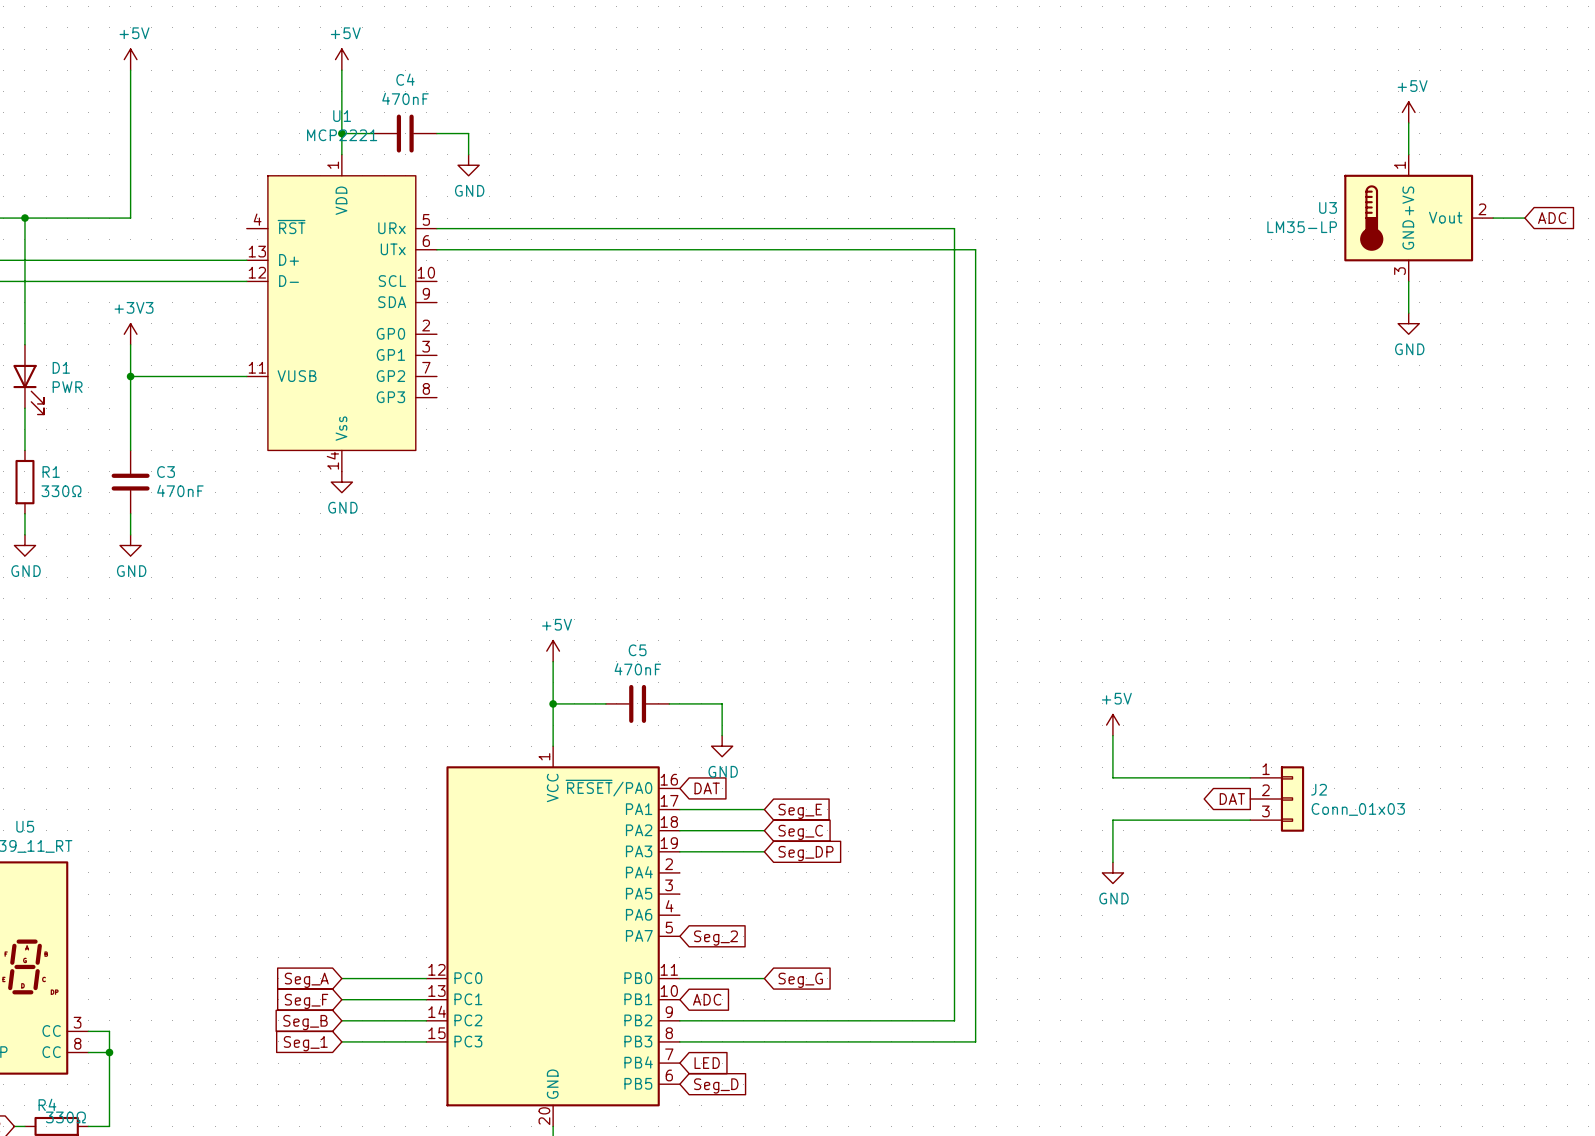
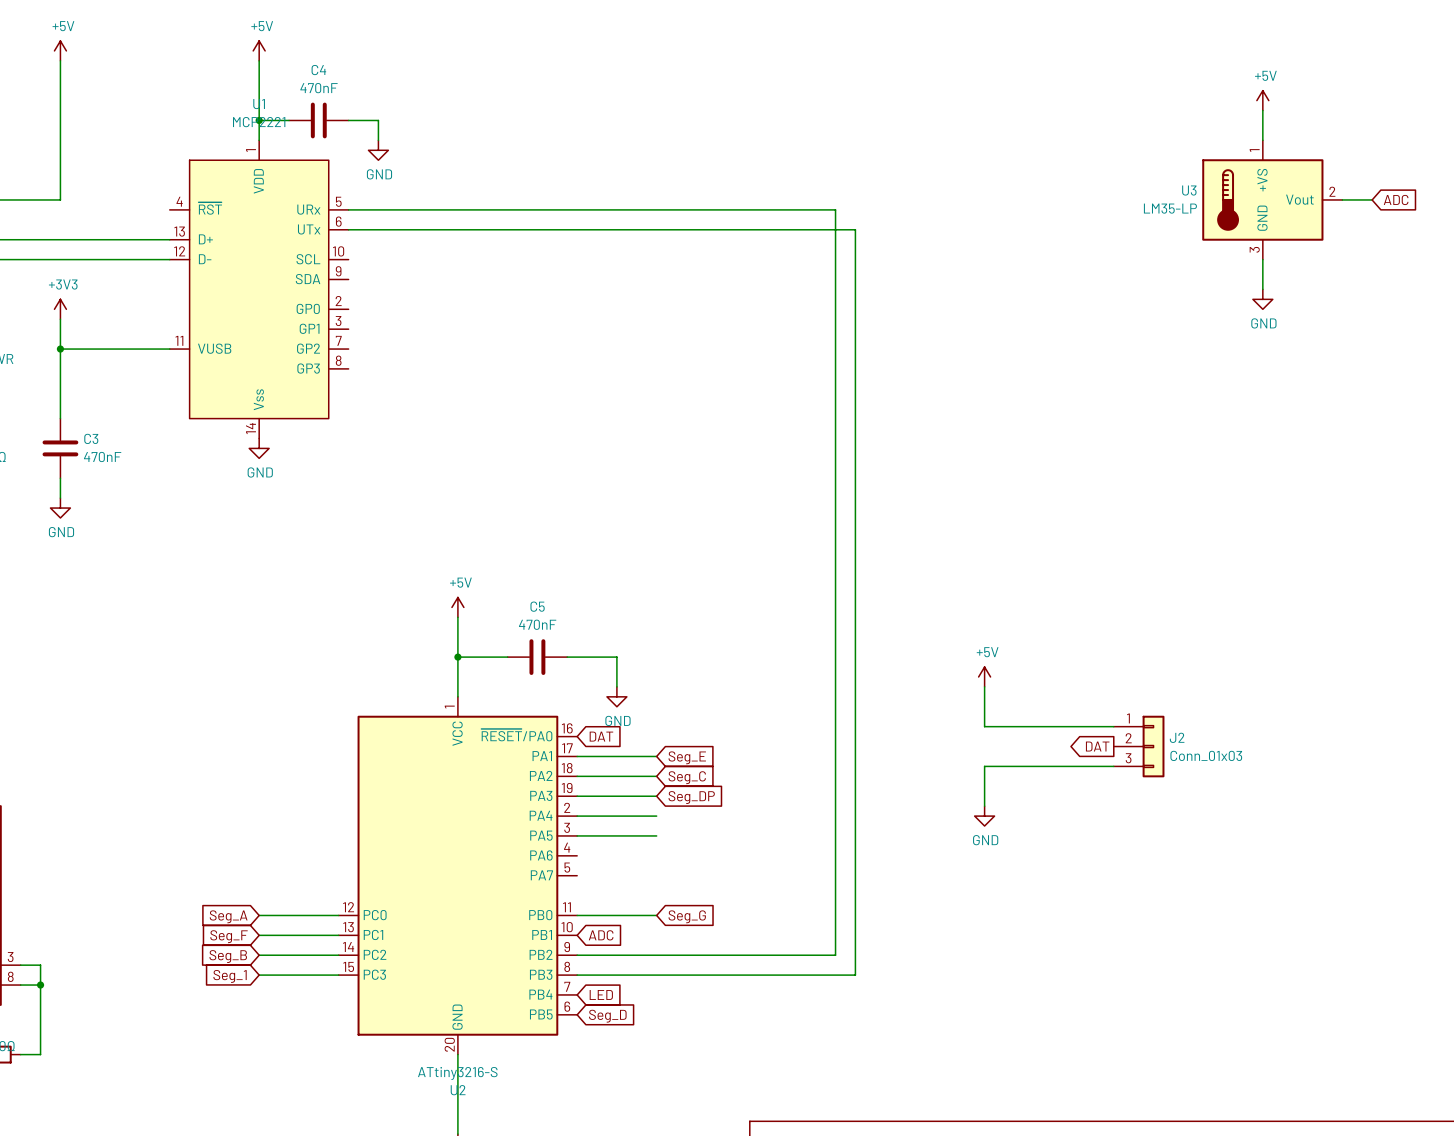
wire: none -> (577, 816) (656, 816)
wire: none -> (577, 835) (656, 835)
global label: Seg_2 (715, 938) -> none

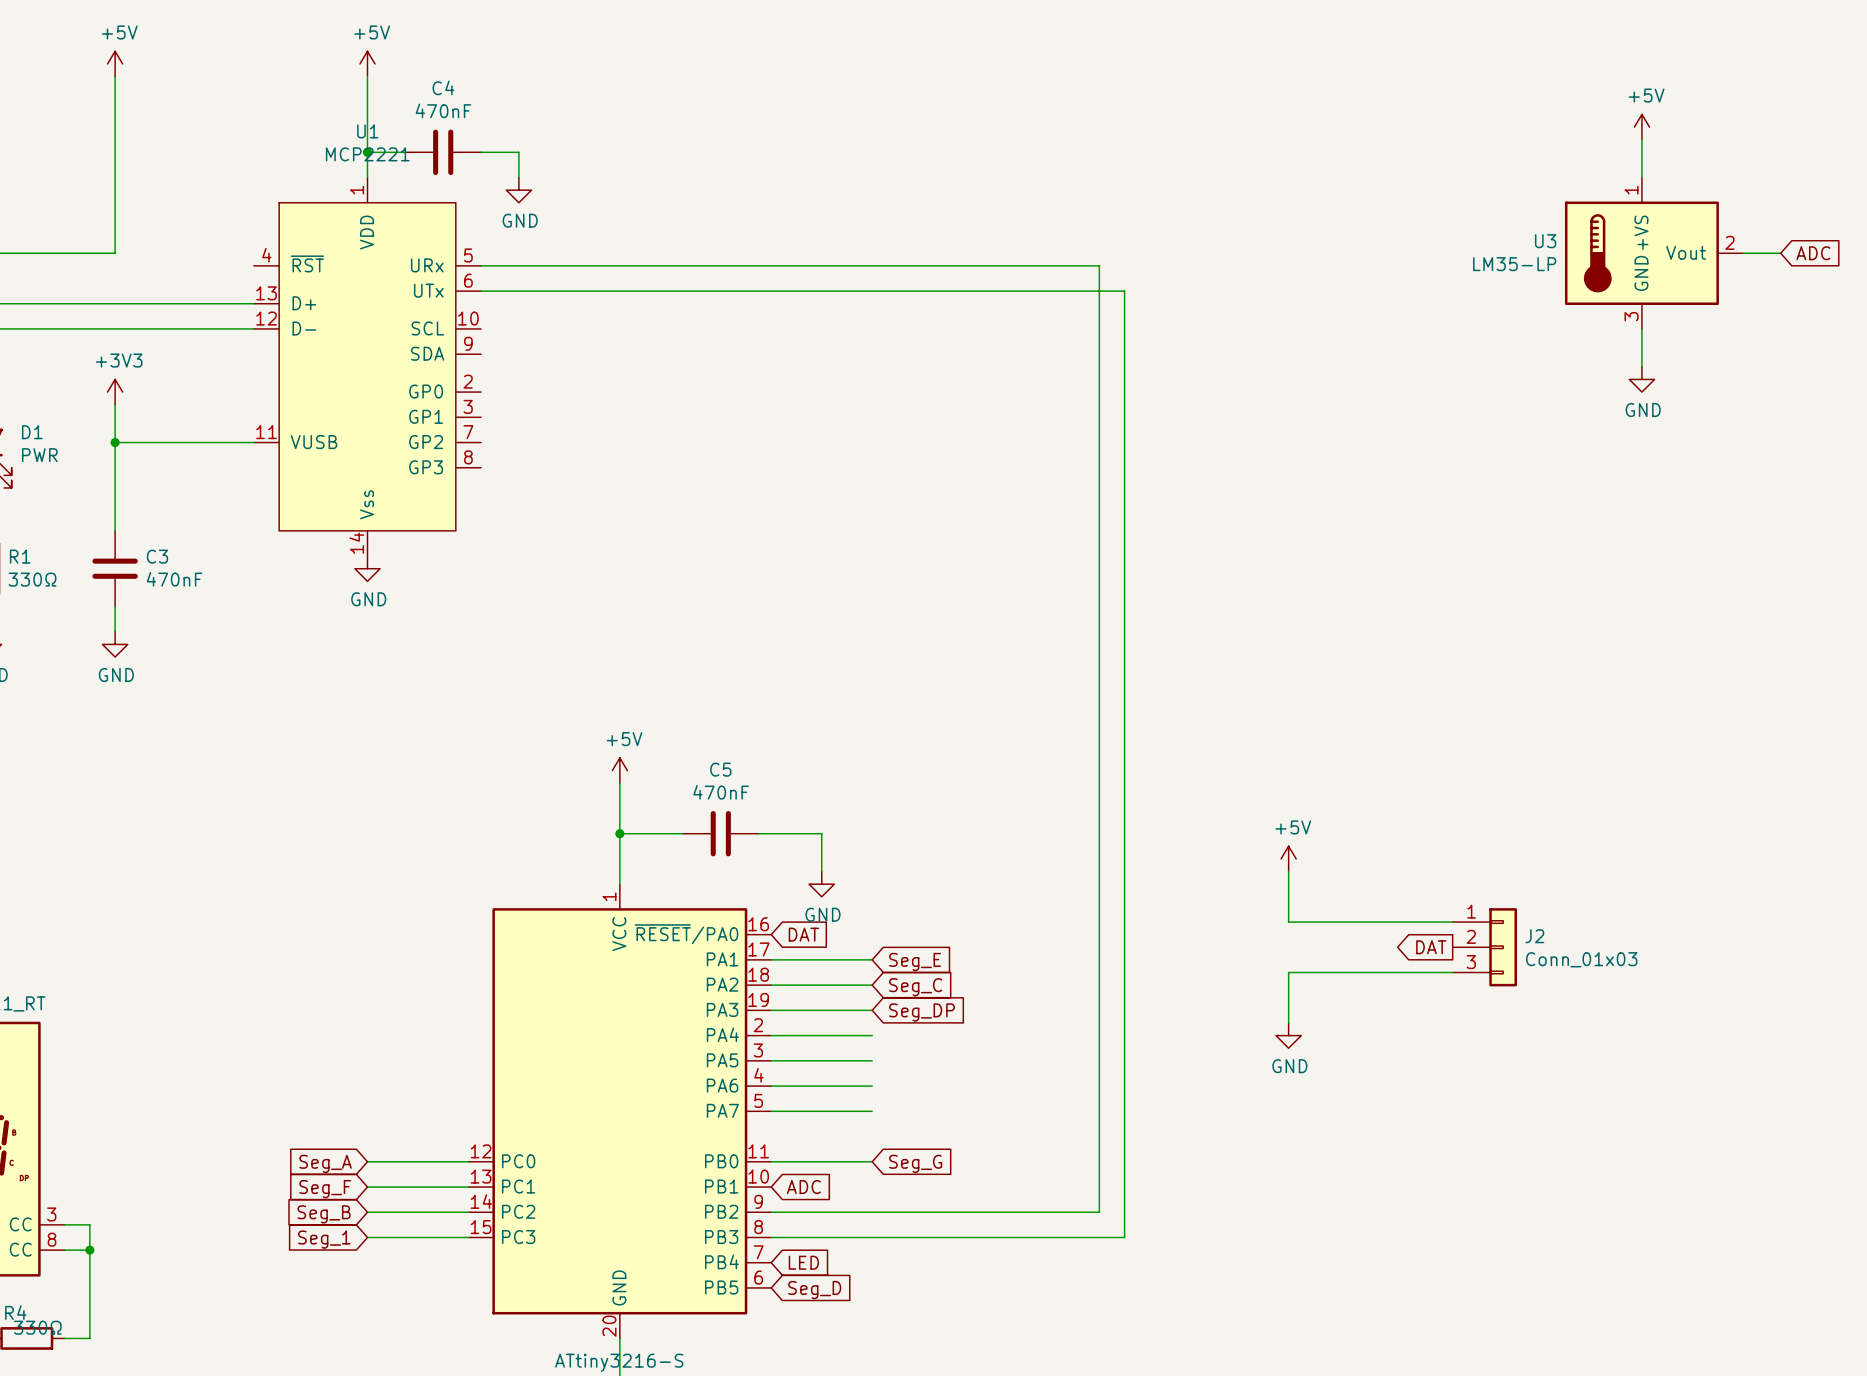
wire: none -> (771, 1086) (872, 1086)
wire: none -> (771, 1111) (872, 1111)

